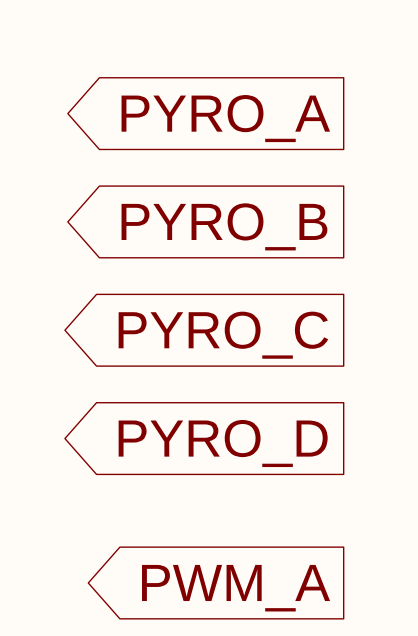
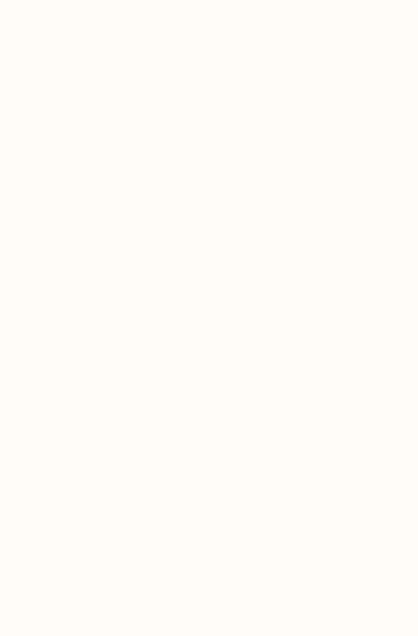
global label: PYRO_A (225, 118) -> none
global label: PYRO_B (224, 226) -> none
global label: PYRO_C (223, 335) -> none
global label: PYRO_D (223, 443) -> none
global label: PWM_A (236, 588) -> none

